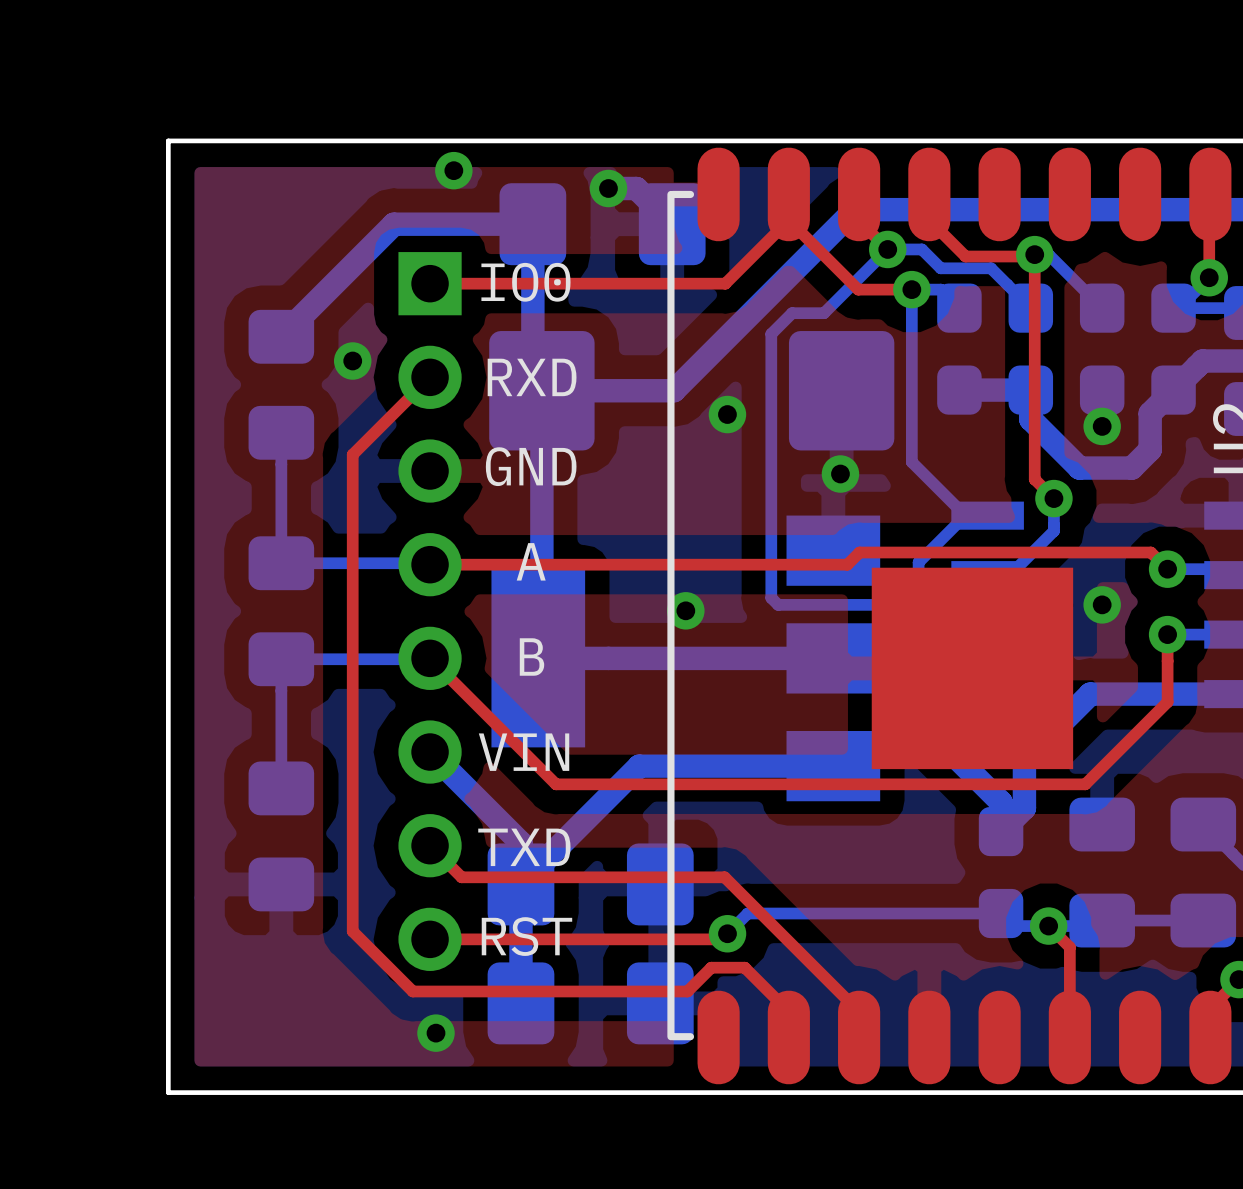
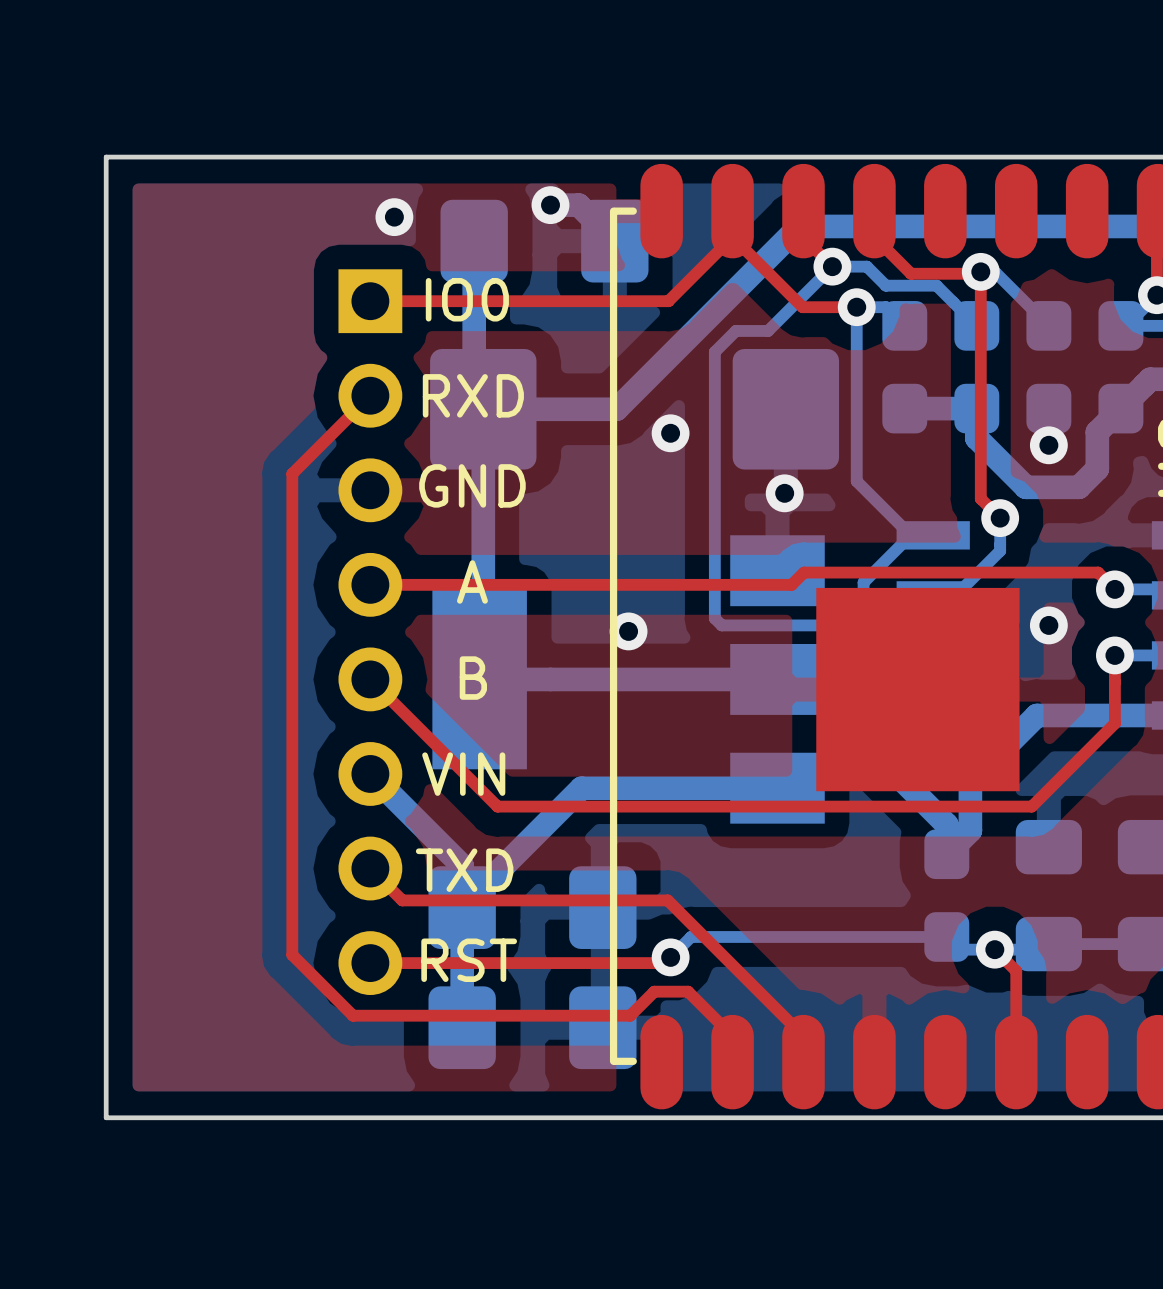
via position: (453, 170) -> (394, 217)
bottom track: (532, 224) (393, 224) (281, 336) -> none
via: (352, 361) -> none
part: (281, 384) -> none
bottom track: (281, 432) (281, 563) (430, 564) -> none
part: (281, 611) -> none
bottom track: (430, 658) (281, 659) (281, 788) -> none
part: (281, 836) -> none
via: (436, 1033) -> none

